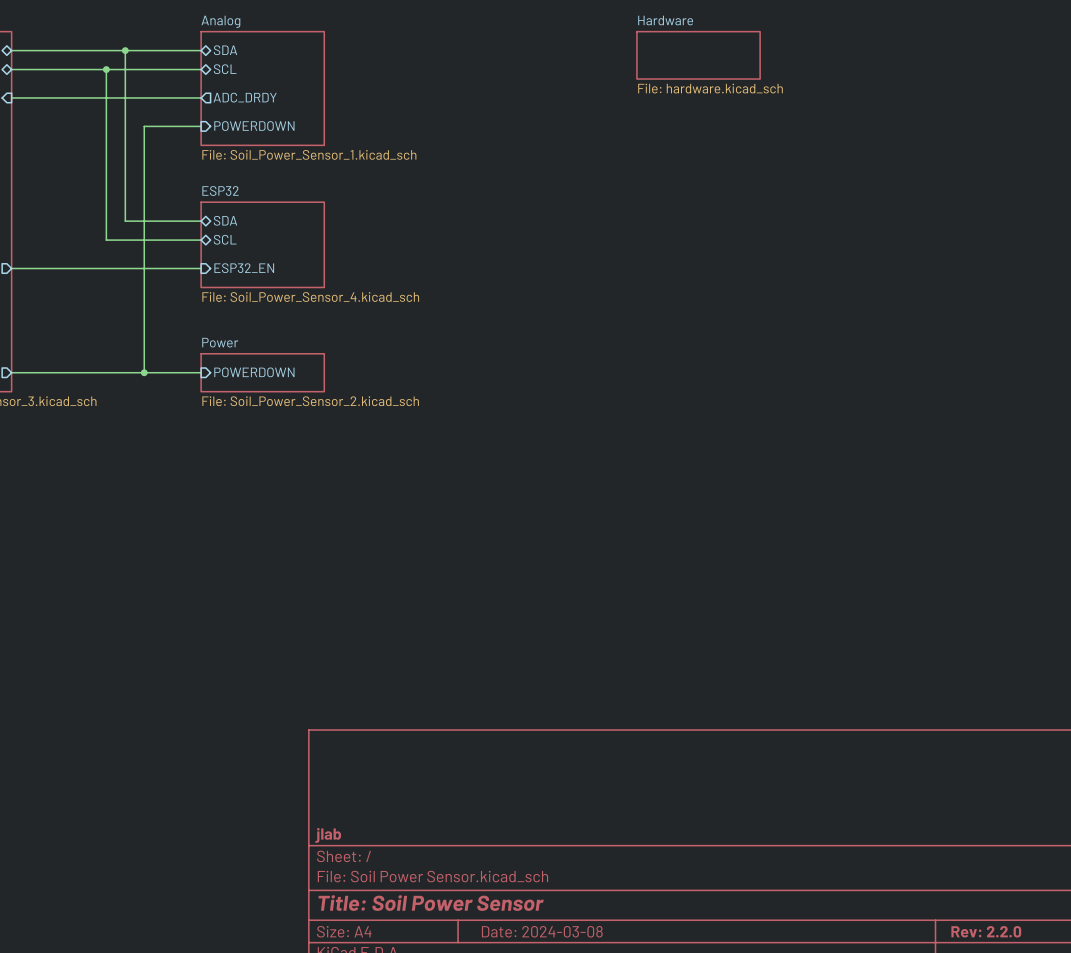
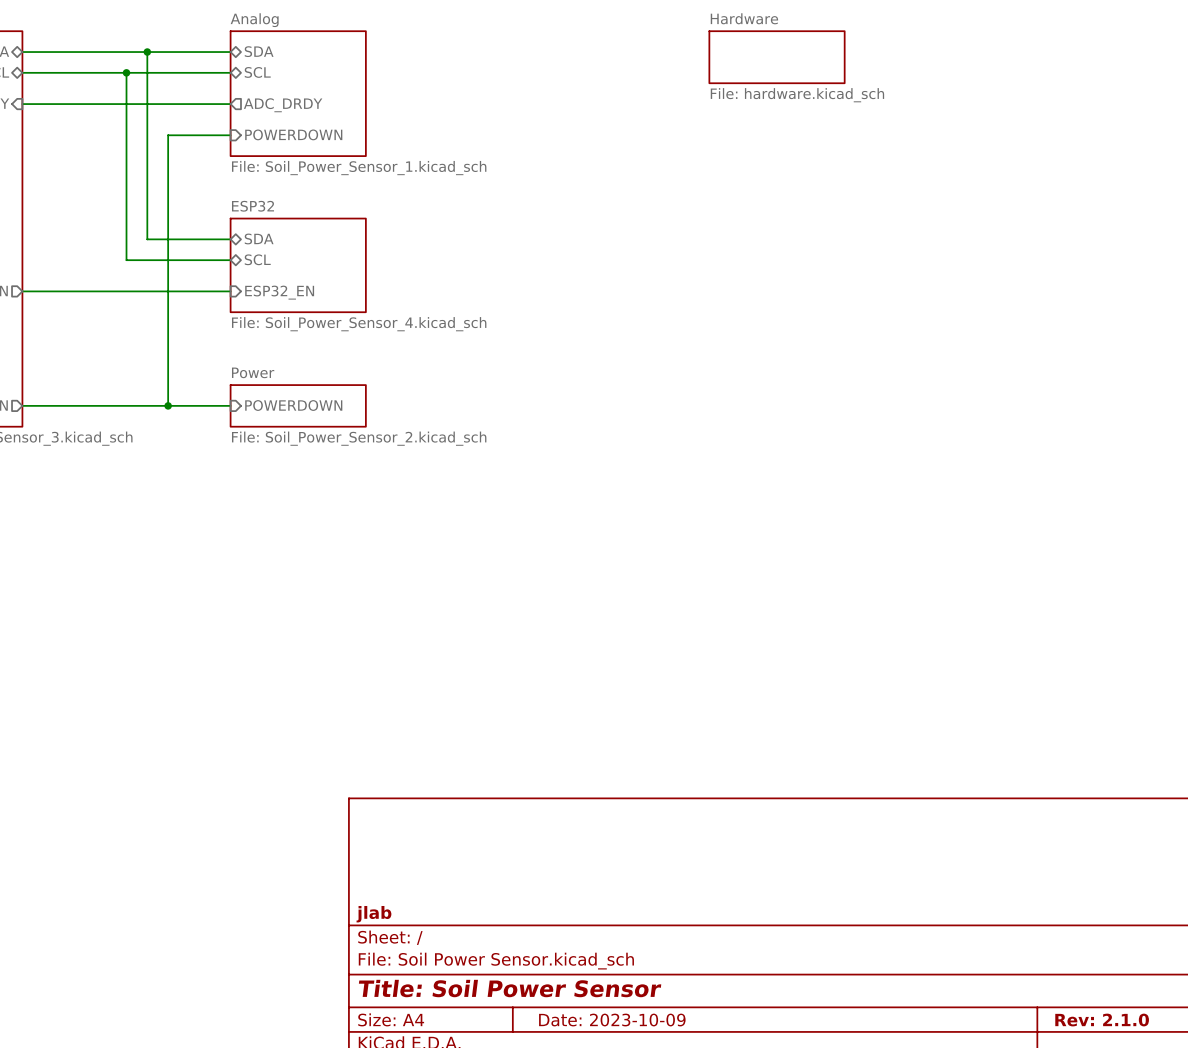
title block: Date: 2024-03-08 (542, 931) -> Date: 2023-10-09 (612, 1020)
title block: Rev: 2.2.0 (986, 931) -> Rev: 2.1.0 (1102, 1020)

